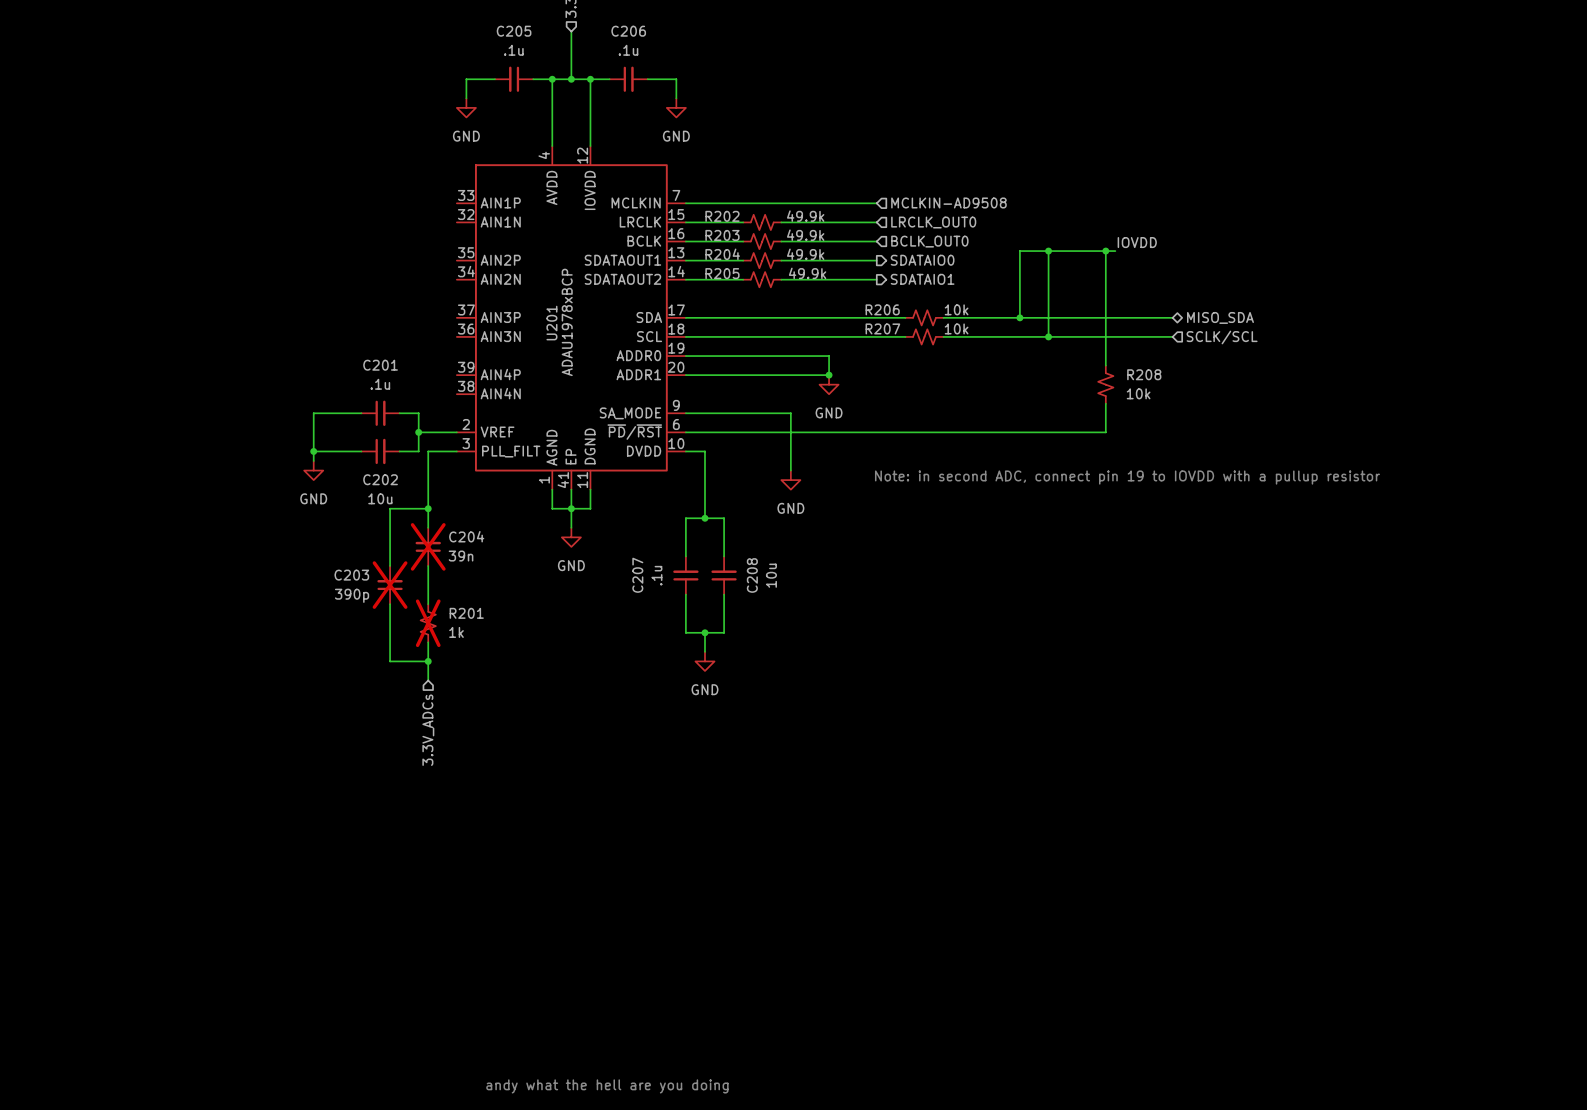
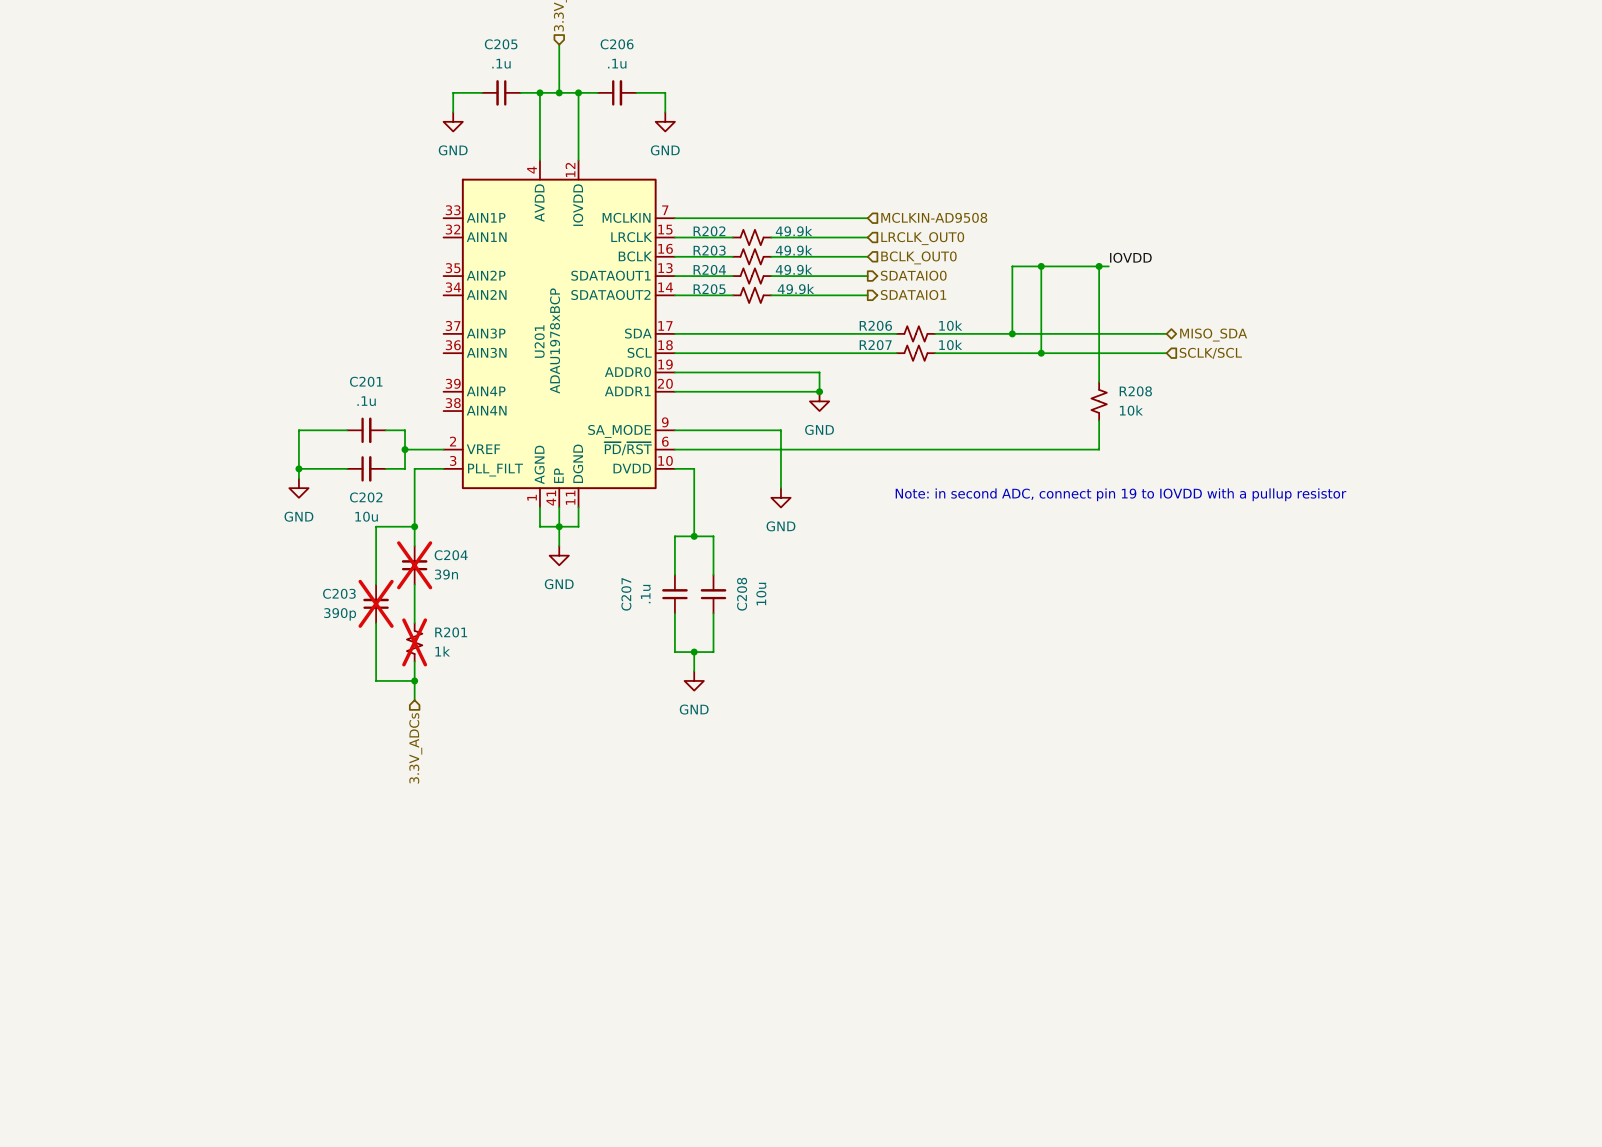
text: andy what the hell are you doing (607, 1086) -> none

